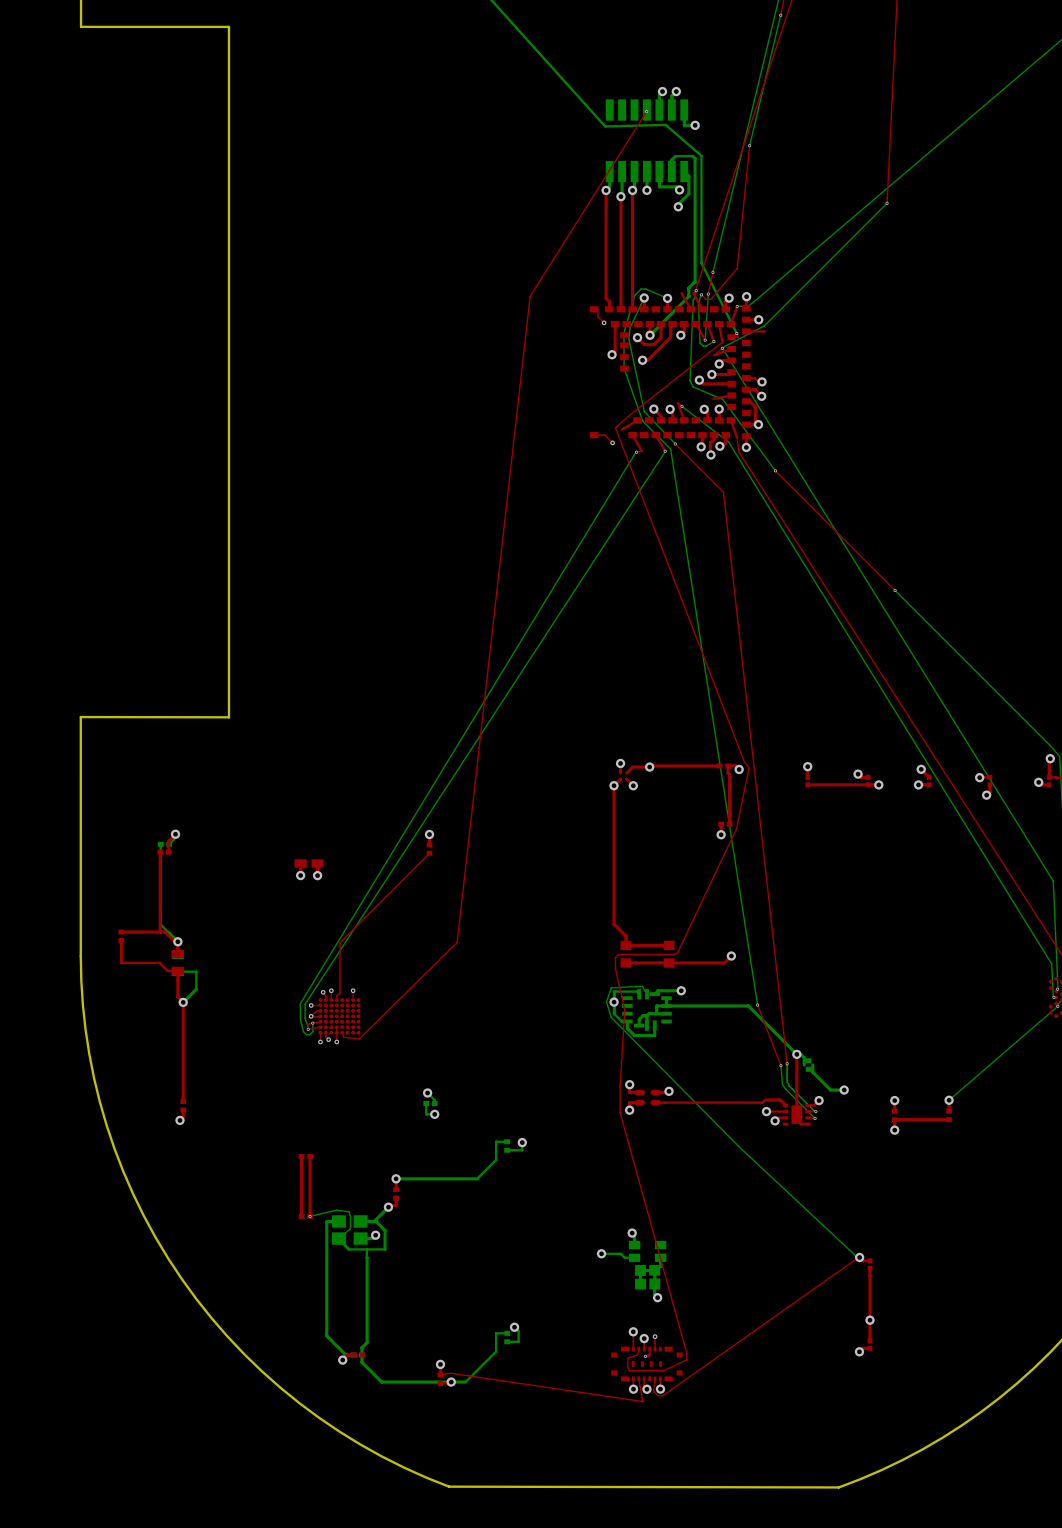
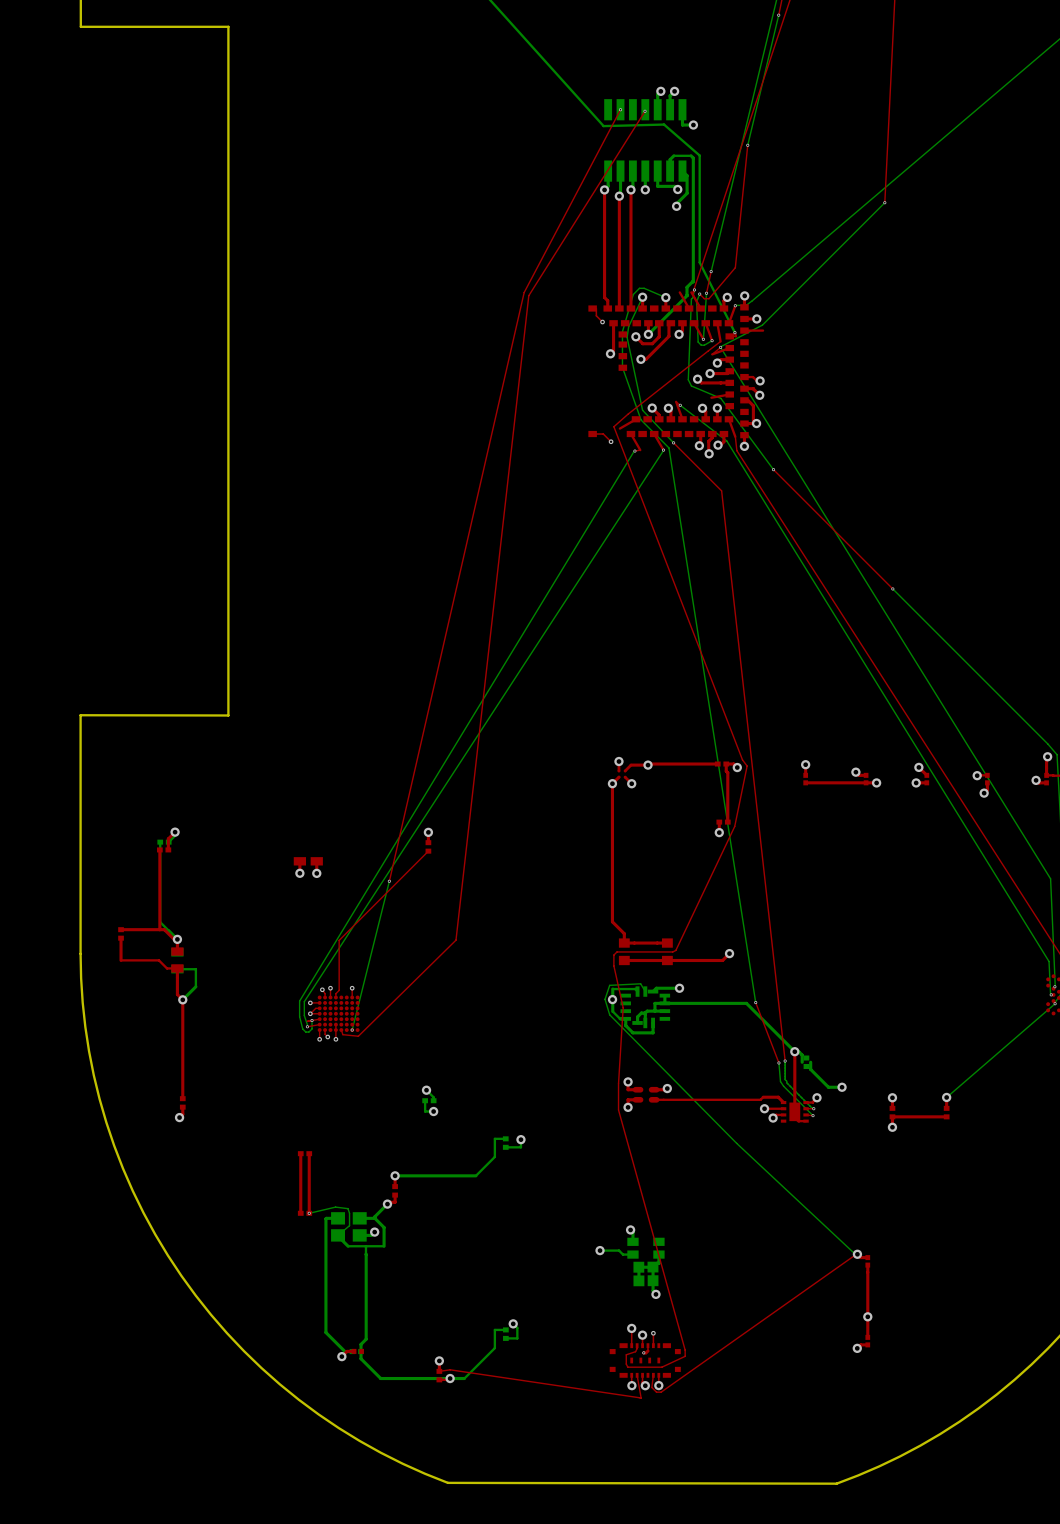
top track: none -> (620, 109) (524, 292) (389, 881)
via: none -> (620, 109)
bottom track: none -> (389, 881) (352, 1030)
via: none -> (389, 881)
via: none -> (352, 1030)

